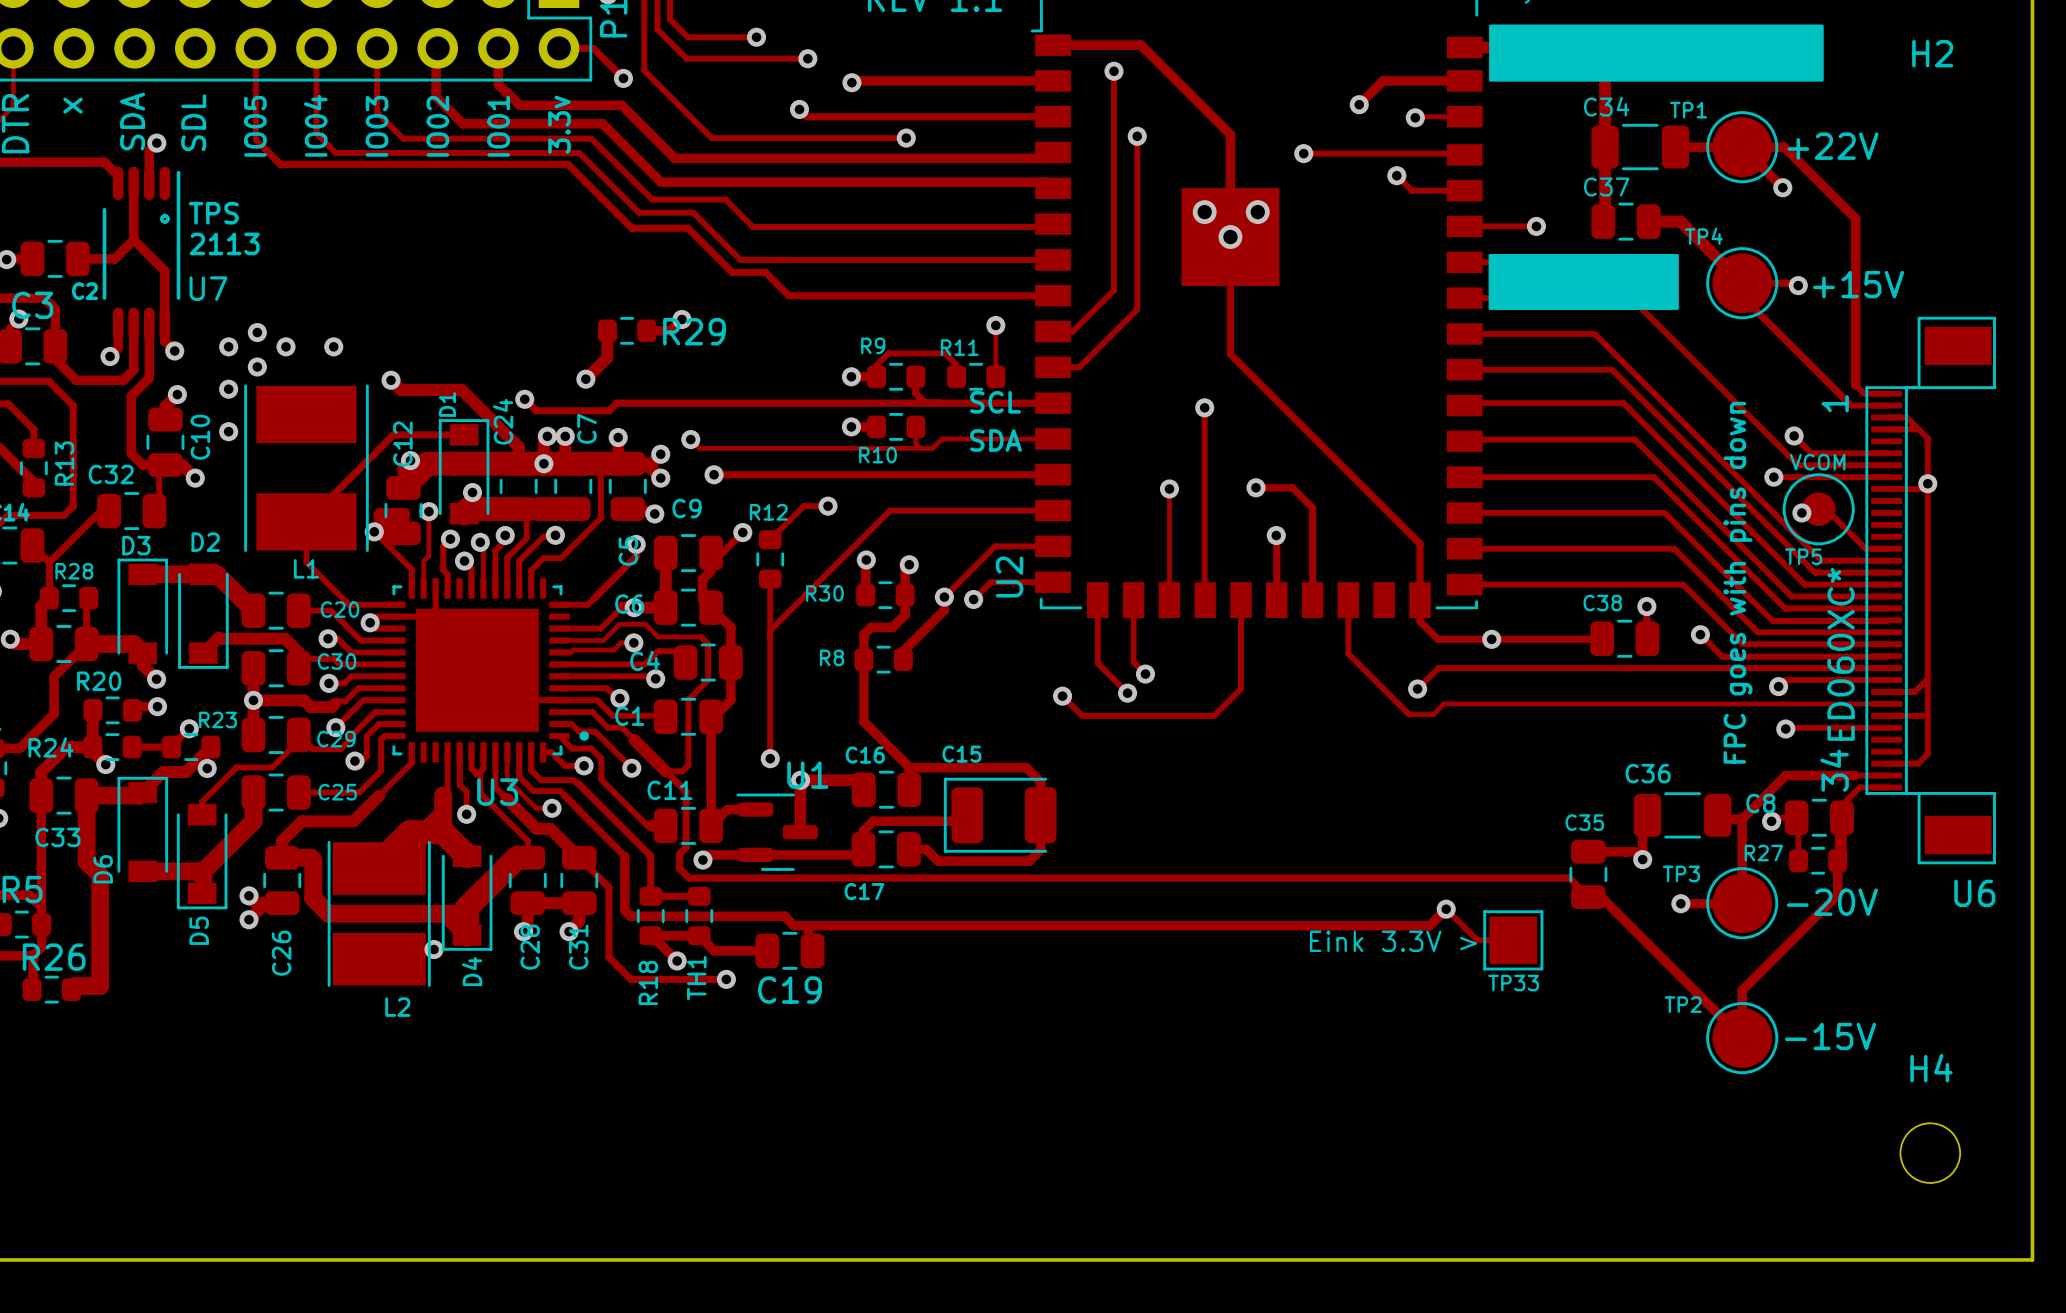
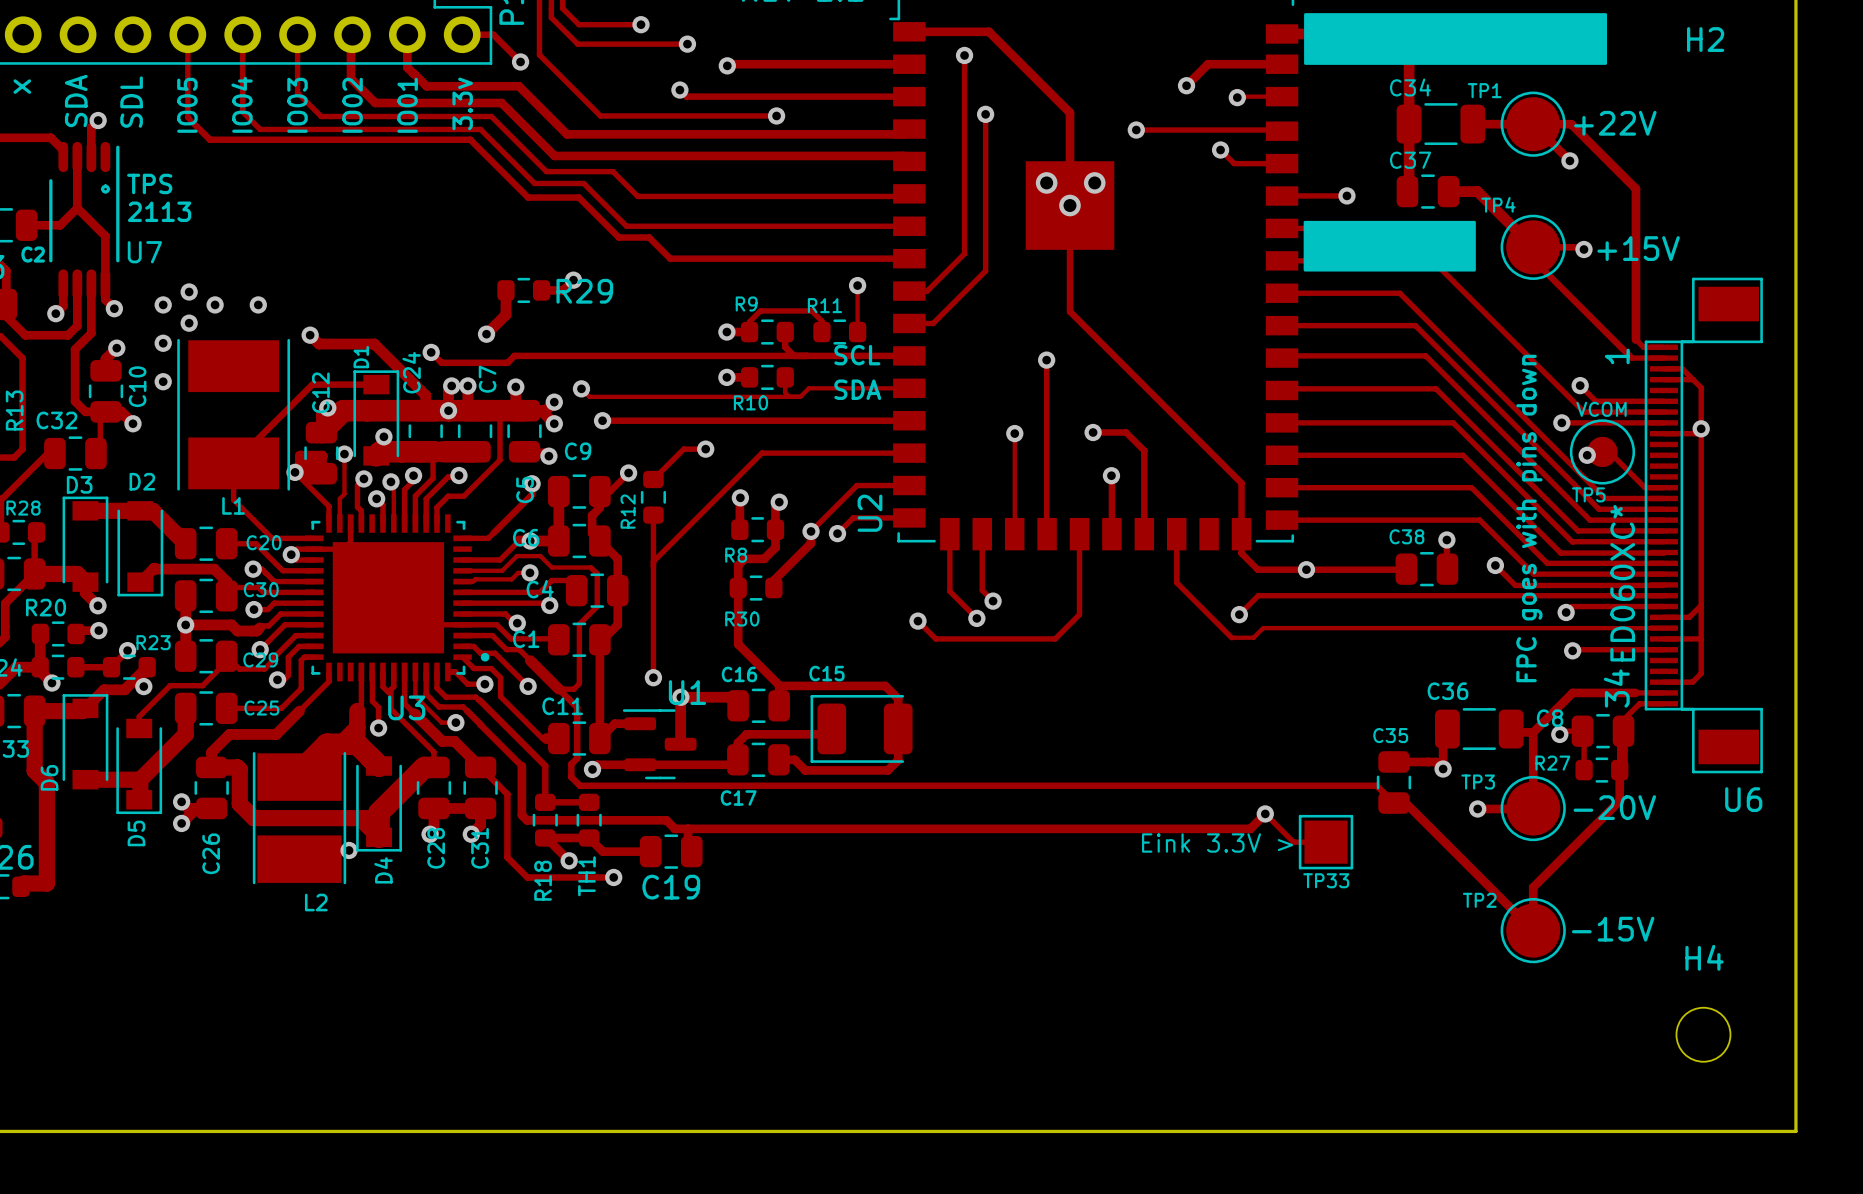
R12 name rotation: 0° (768, 512) -> 90° counterclockwise (628, 511)
R12 name position: R12 (768, 512) -> R12 (628, 511)
R30 name position: R30 (824, 593) -> R30 (742, 619)
R8 name position: R8 (832, 657) -> R8 (736, 555)

